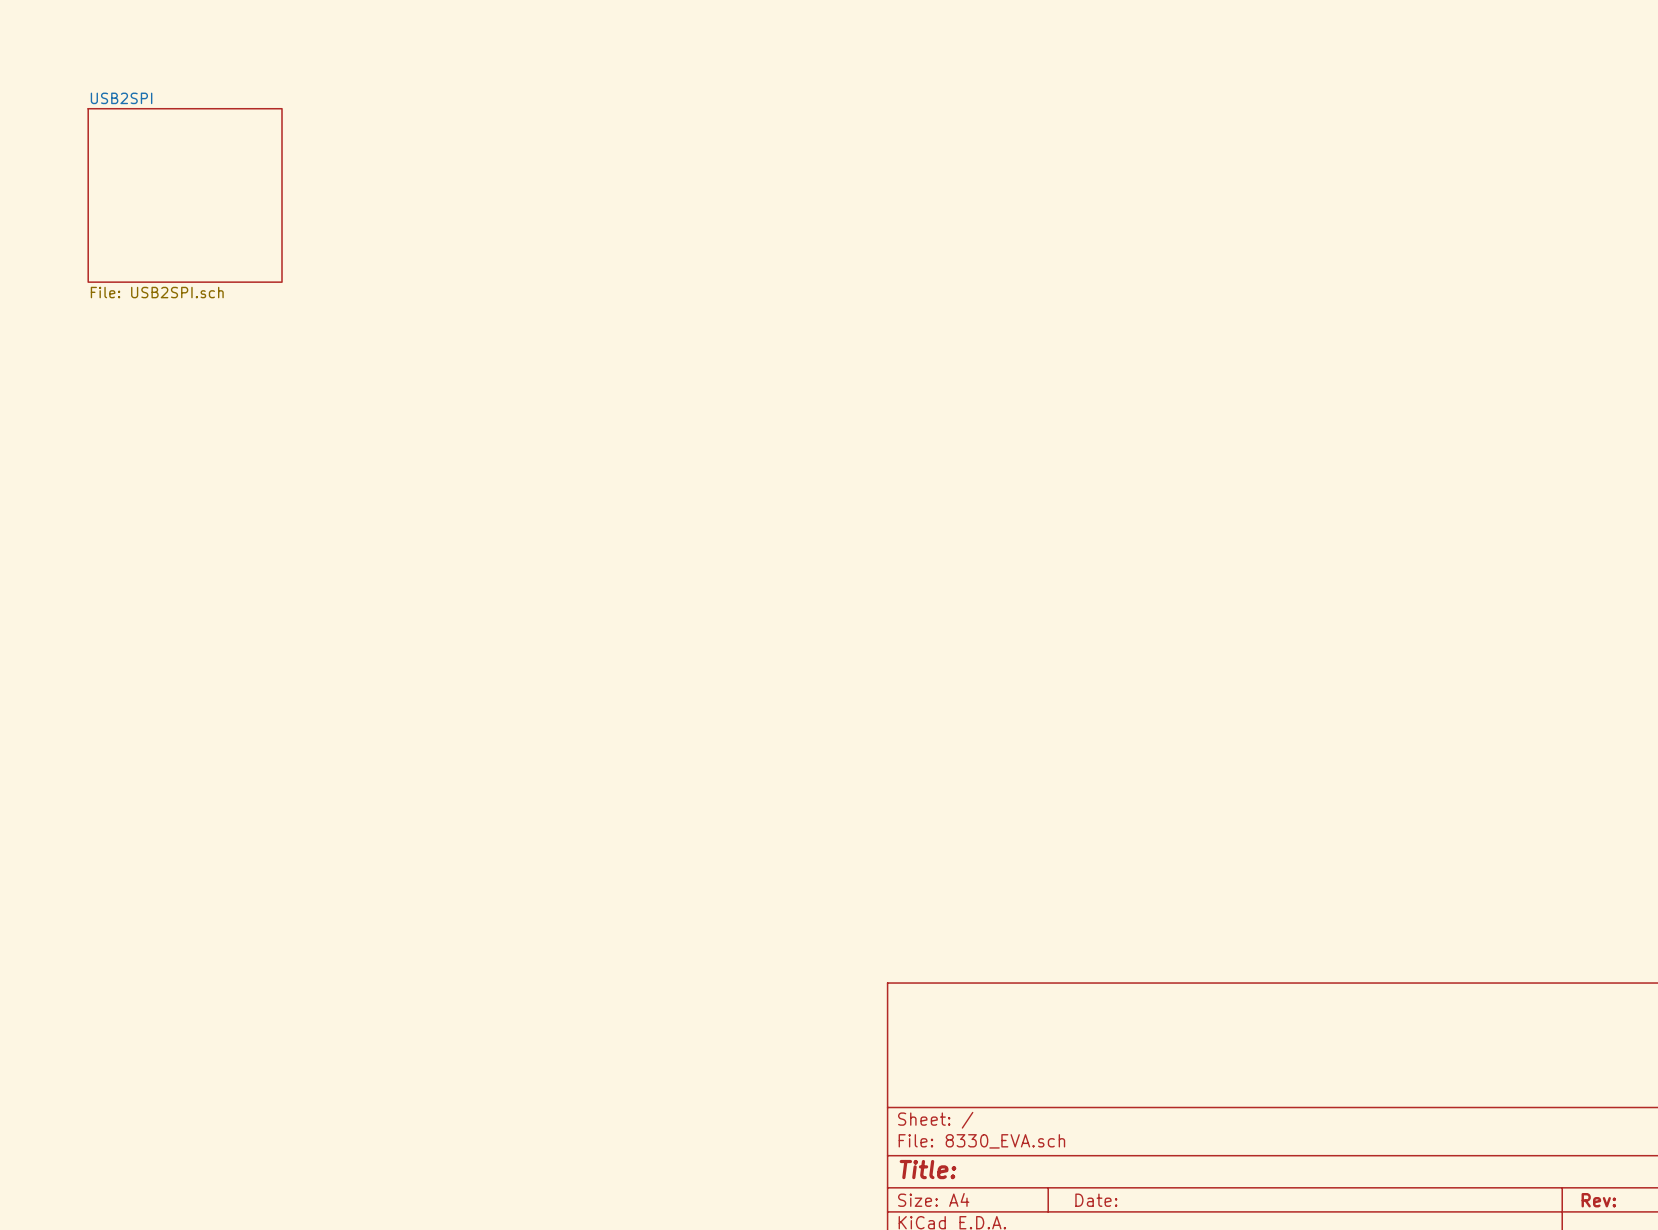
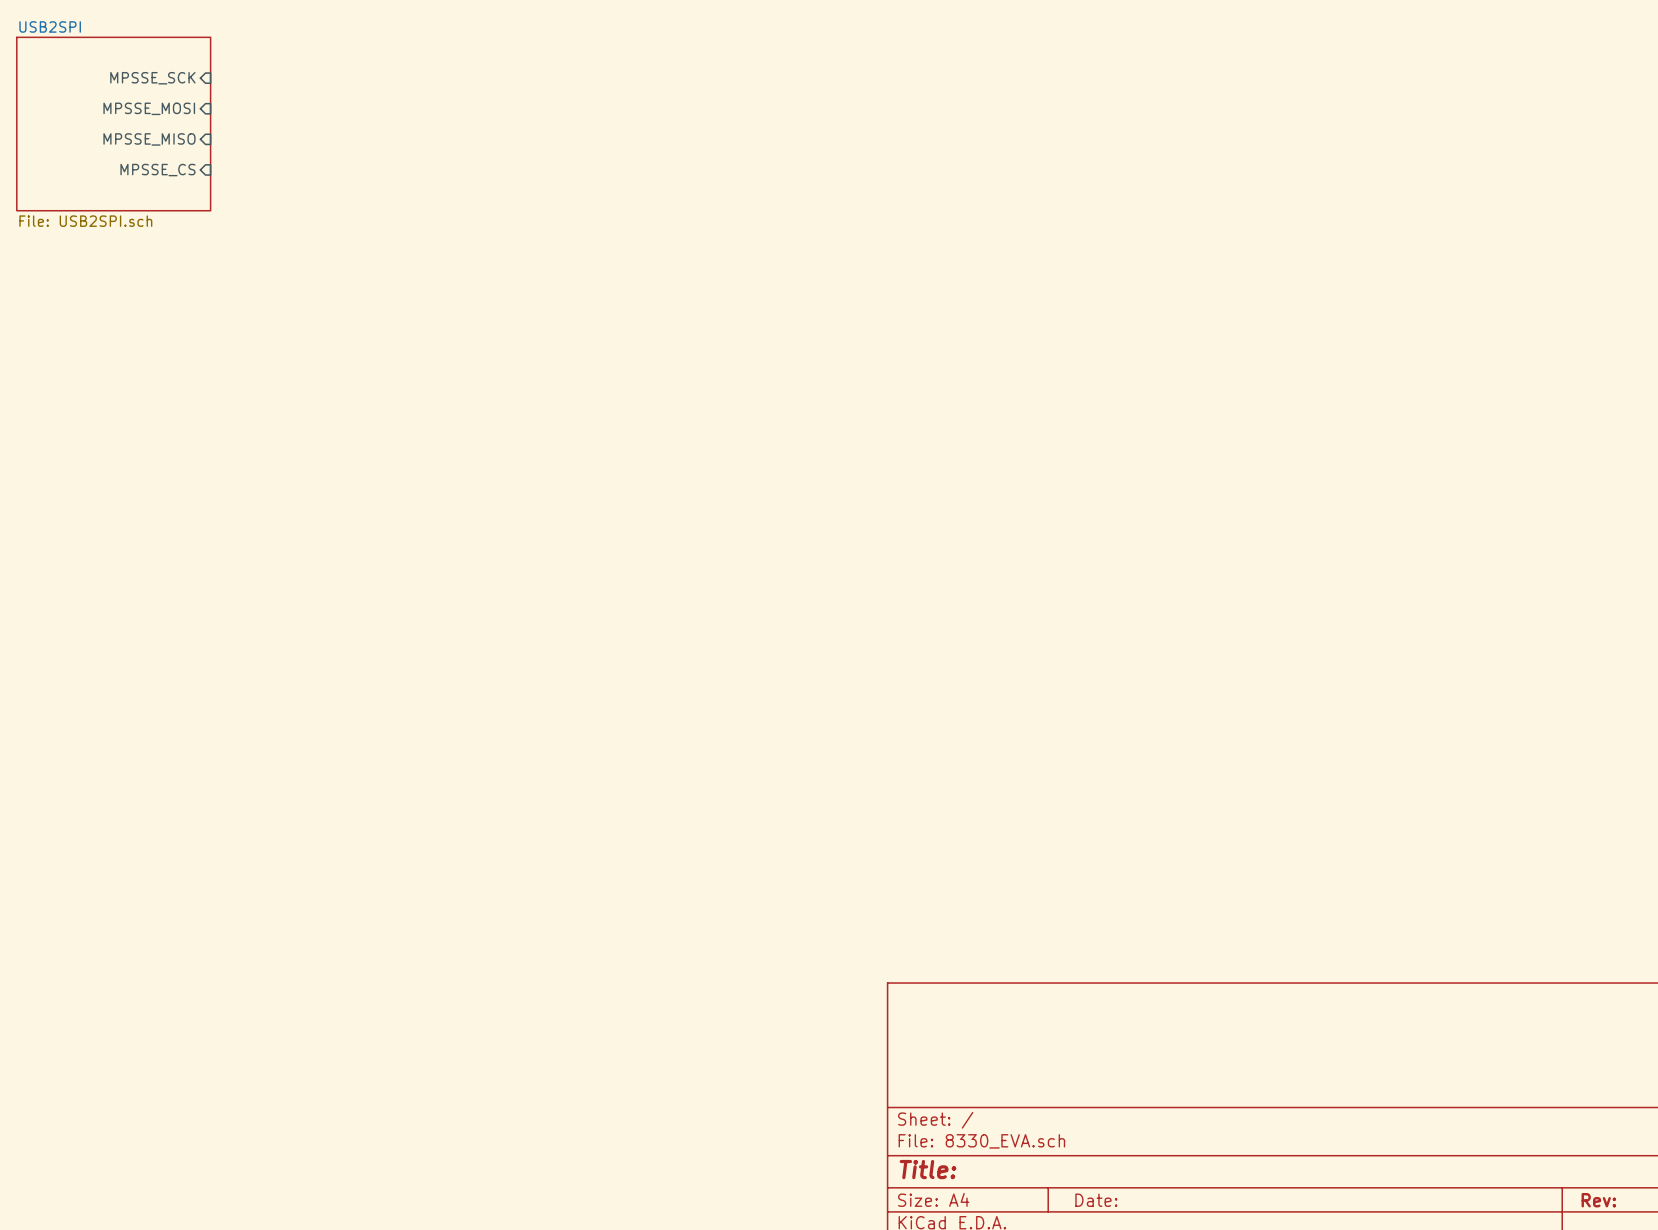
sheet pin: none -> MPSSE_SCK (152, 78)
sheet pin: none -> MPSSE_MOSI (149, 108)
sheet pin: none -> MPSSE_MISO (149, 139)
sheet pin: none -> MPSSE_CS (157, 170)
sheet USB2SPI position: (185, 195) -> (113, 124)

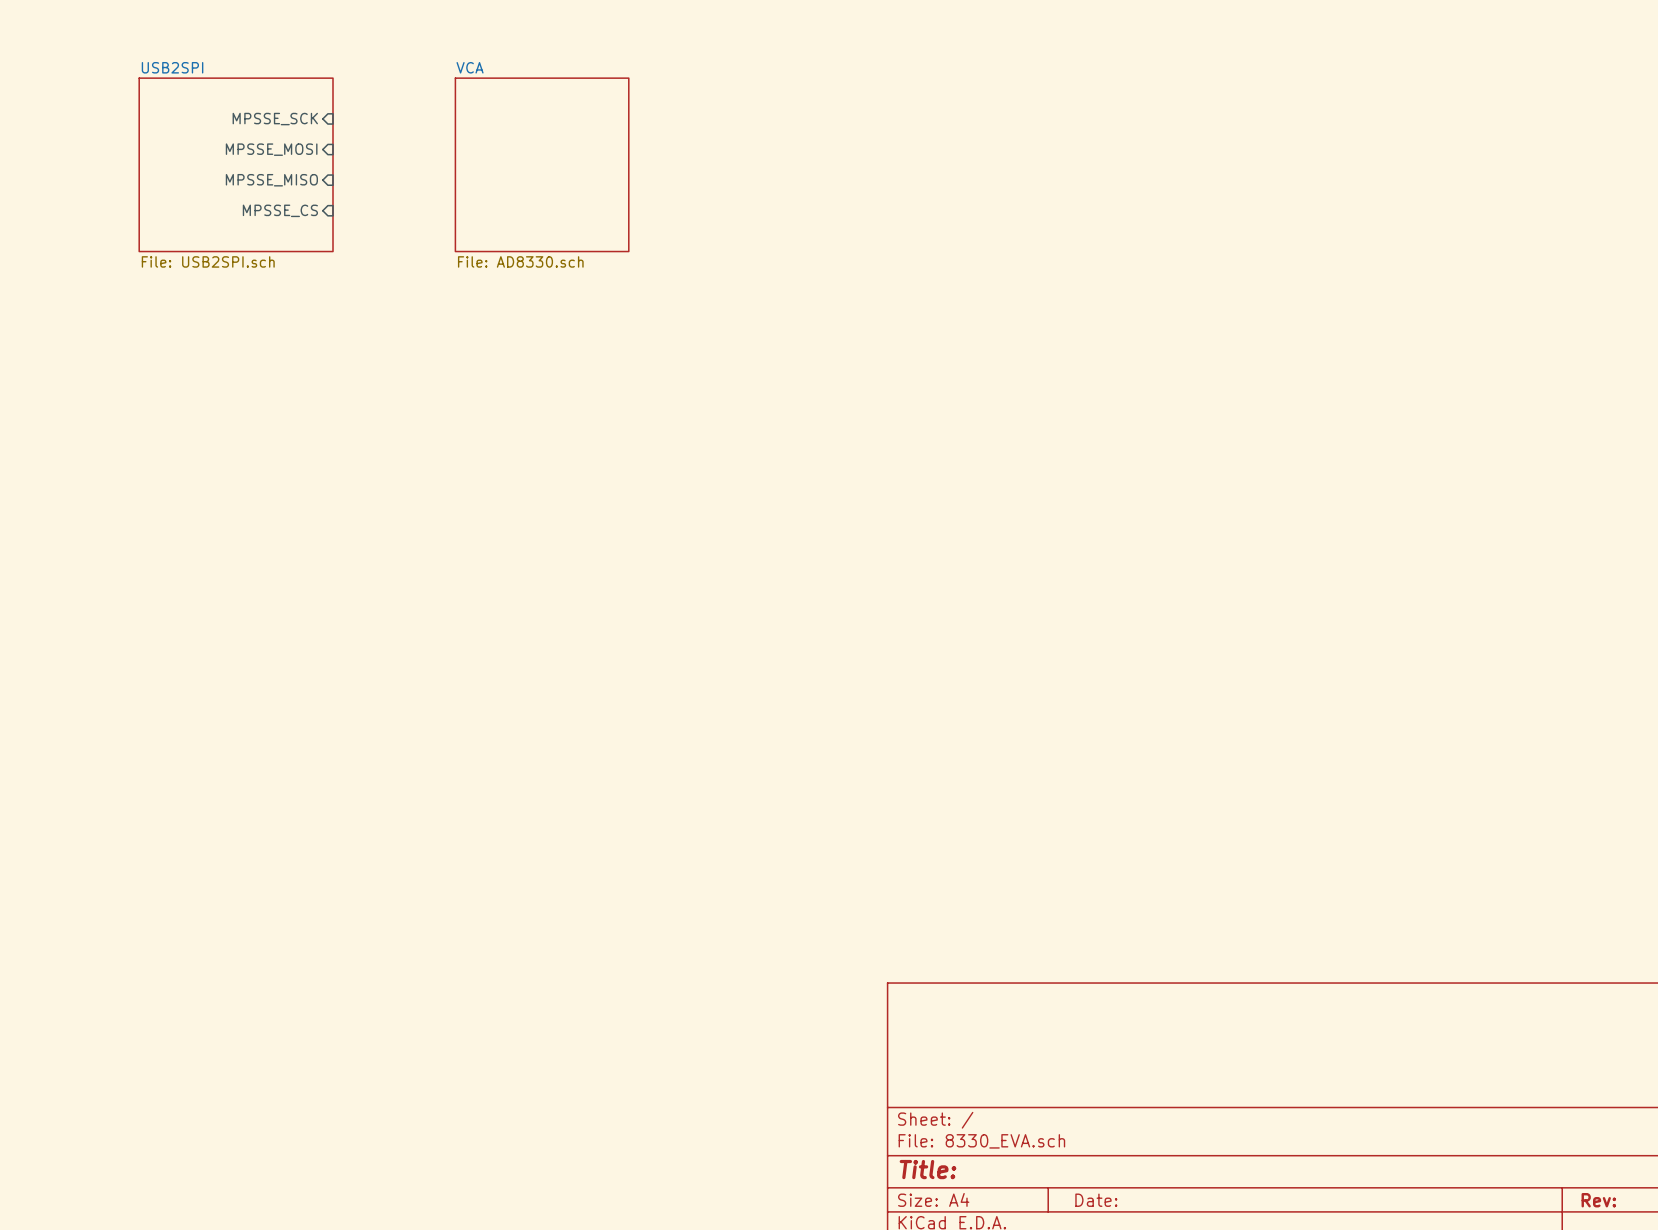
sheet pin position: MPSSE_SCK (152, 78) -> MPSSE_SCK (275, 119)
sheet pin position: MPSSE_MOSI (149, 108) -> MPSSE_MOSI (271, 149)
sheet USB2SPI position: (113, 124) -> (236, 164)
sheet pin position: MPSSE_MISO (149, 139) -> MPSSE_MISO (271, 180)
sheet VCA: none -> File: AD8330.sch (542, 164)
sheet pin position: MPSSE_CS (157, 170) -> MPSSE_CS (280, 210)

